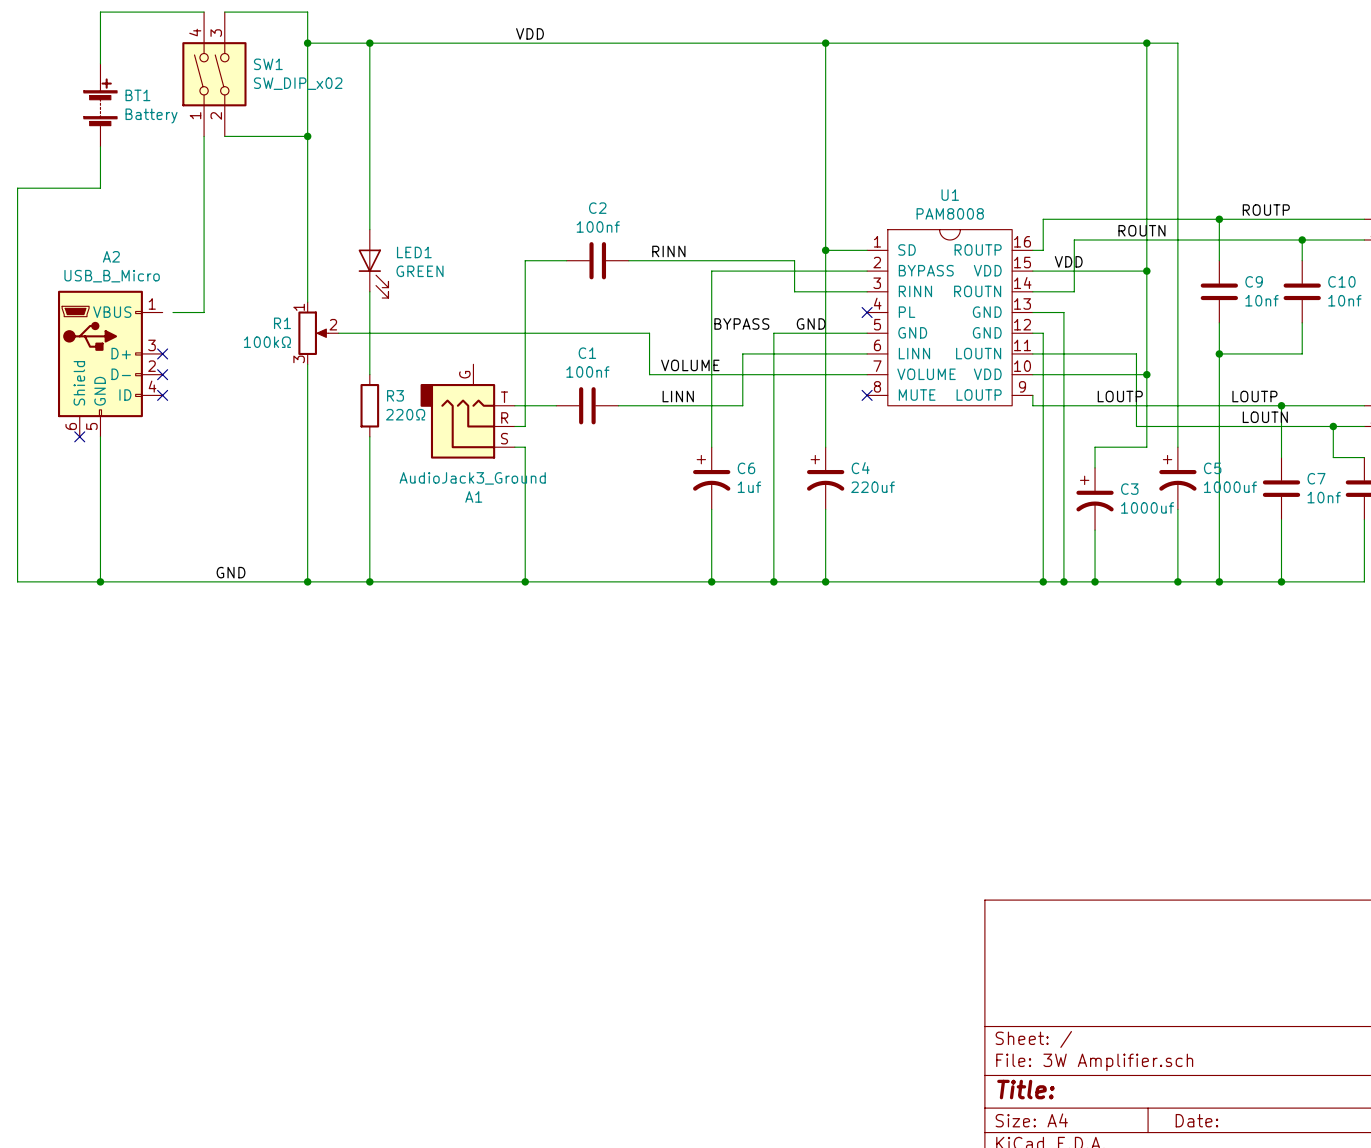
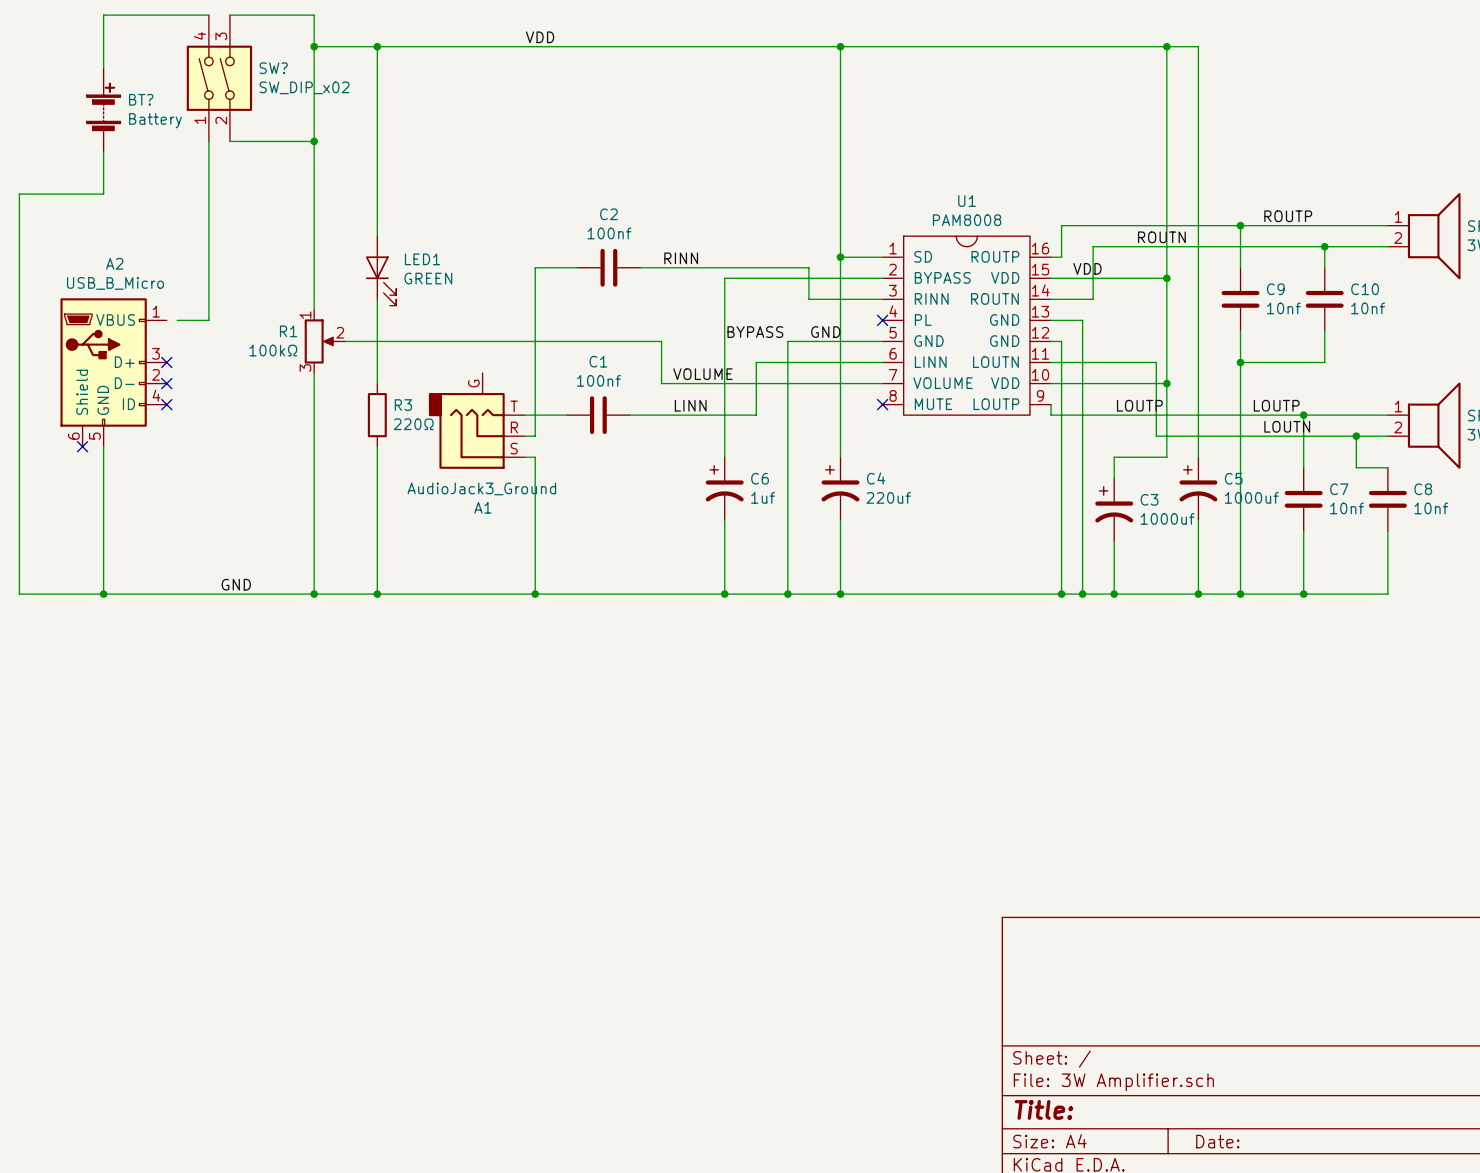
SW1 name: SW1 (268, 64) -> SW? (273, 68)
BT1 name: BT1 (137, 95) -> BT? (141, 99)

